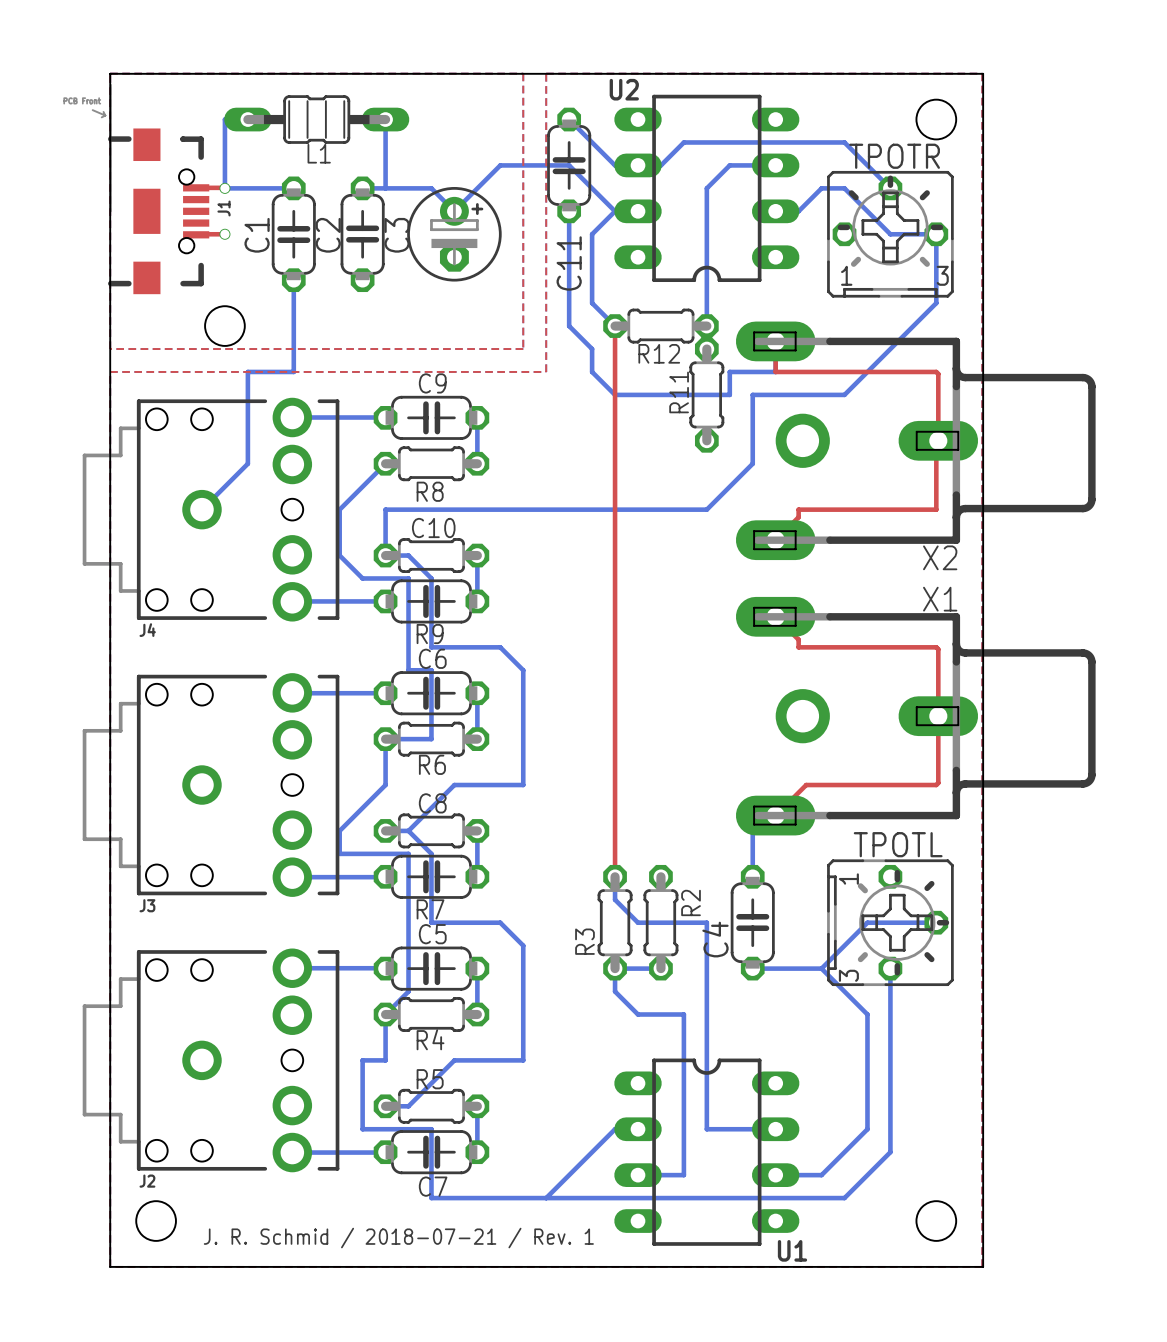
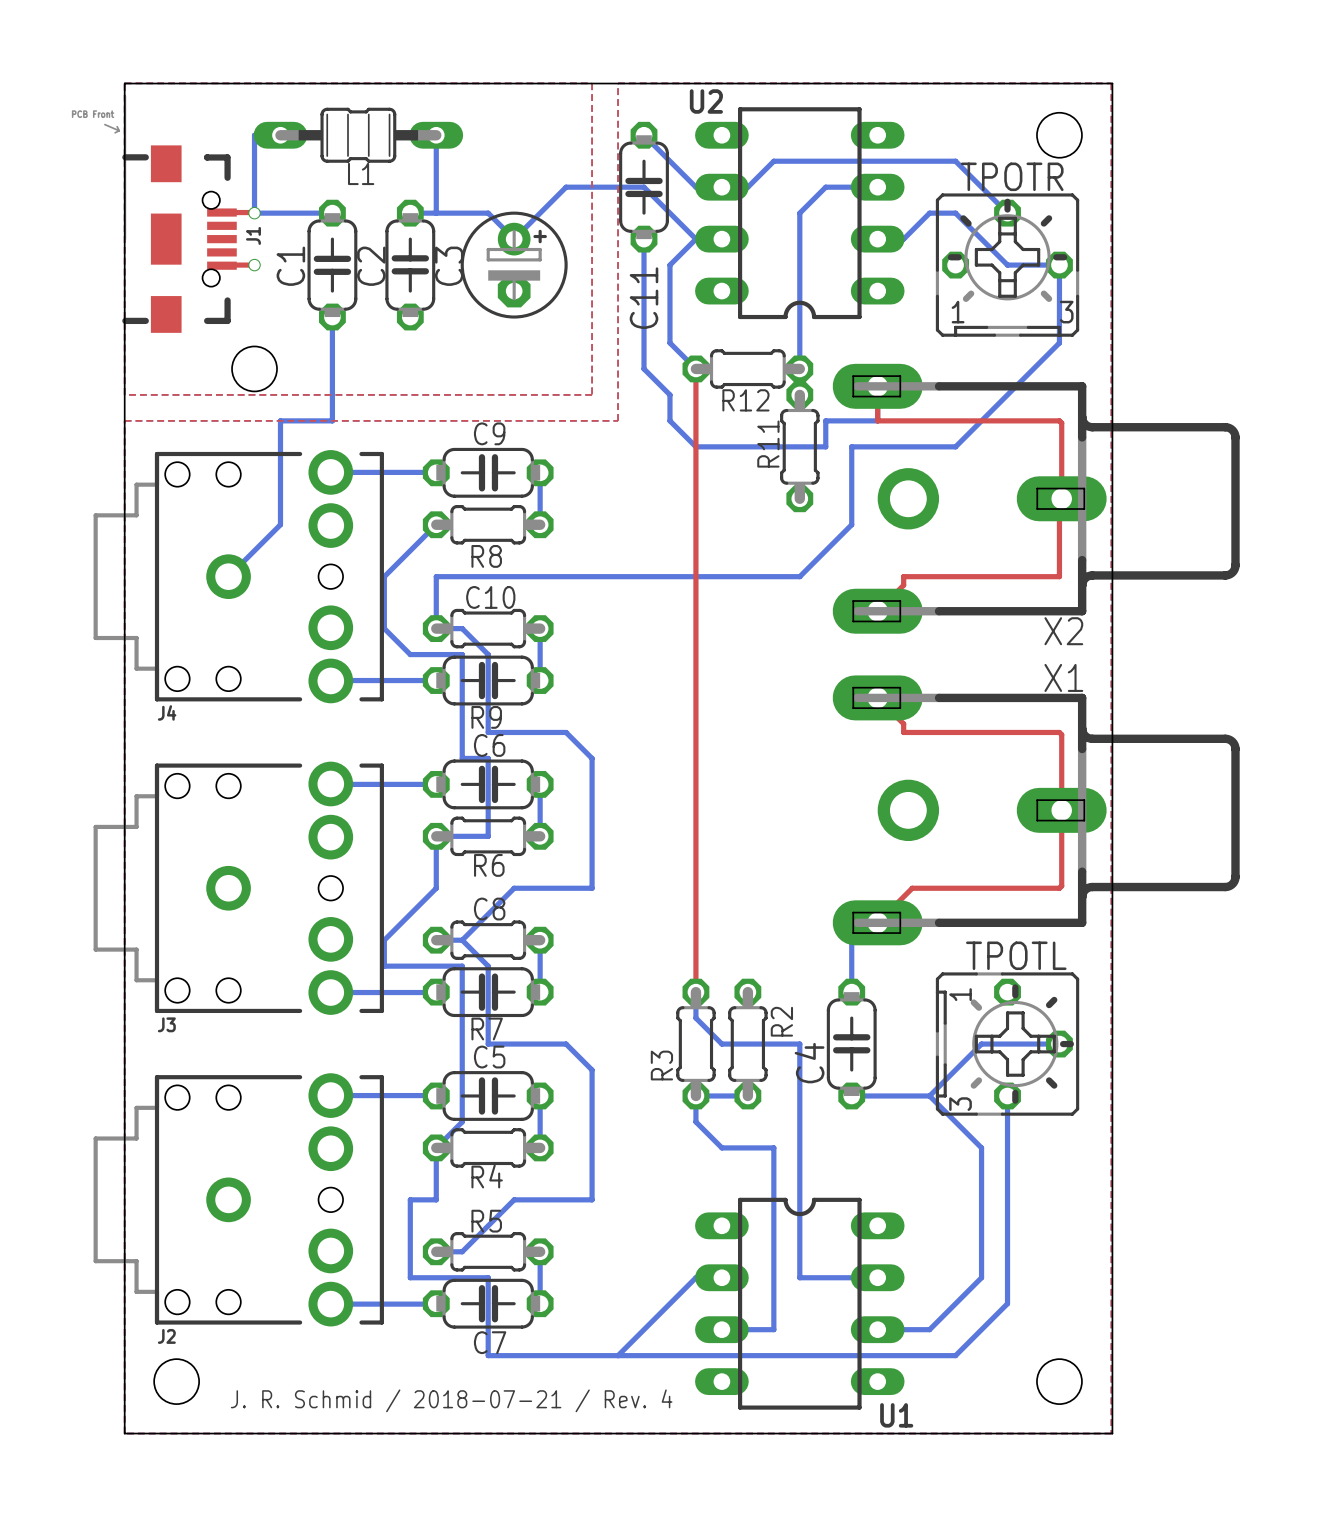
text: J. R. Schmid / 2018-07-21 / Rev. 1 (398, 1238) -> J. R. Schmid / 2018-07-21 / Rev. 4 (451, 1400)

